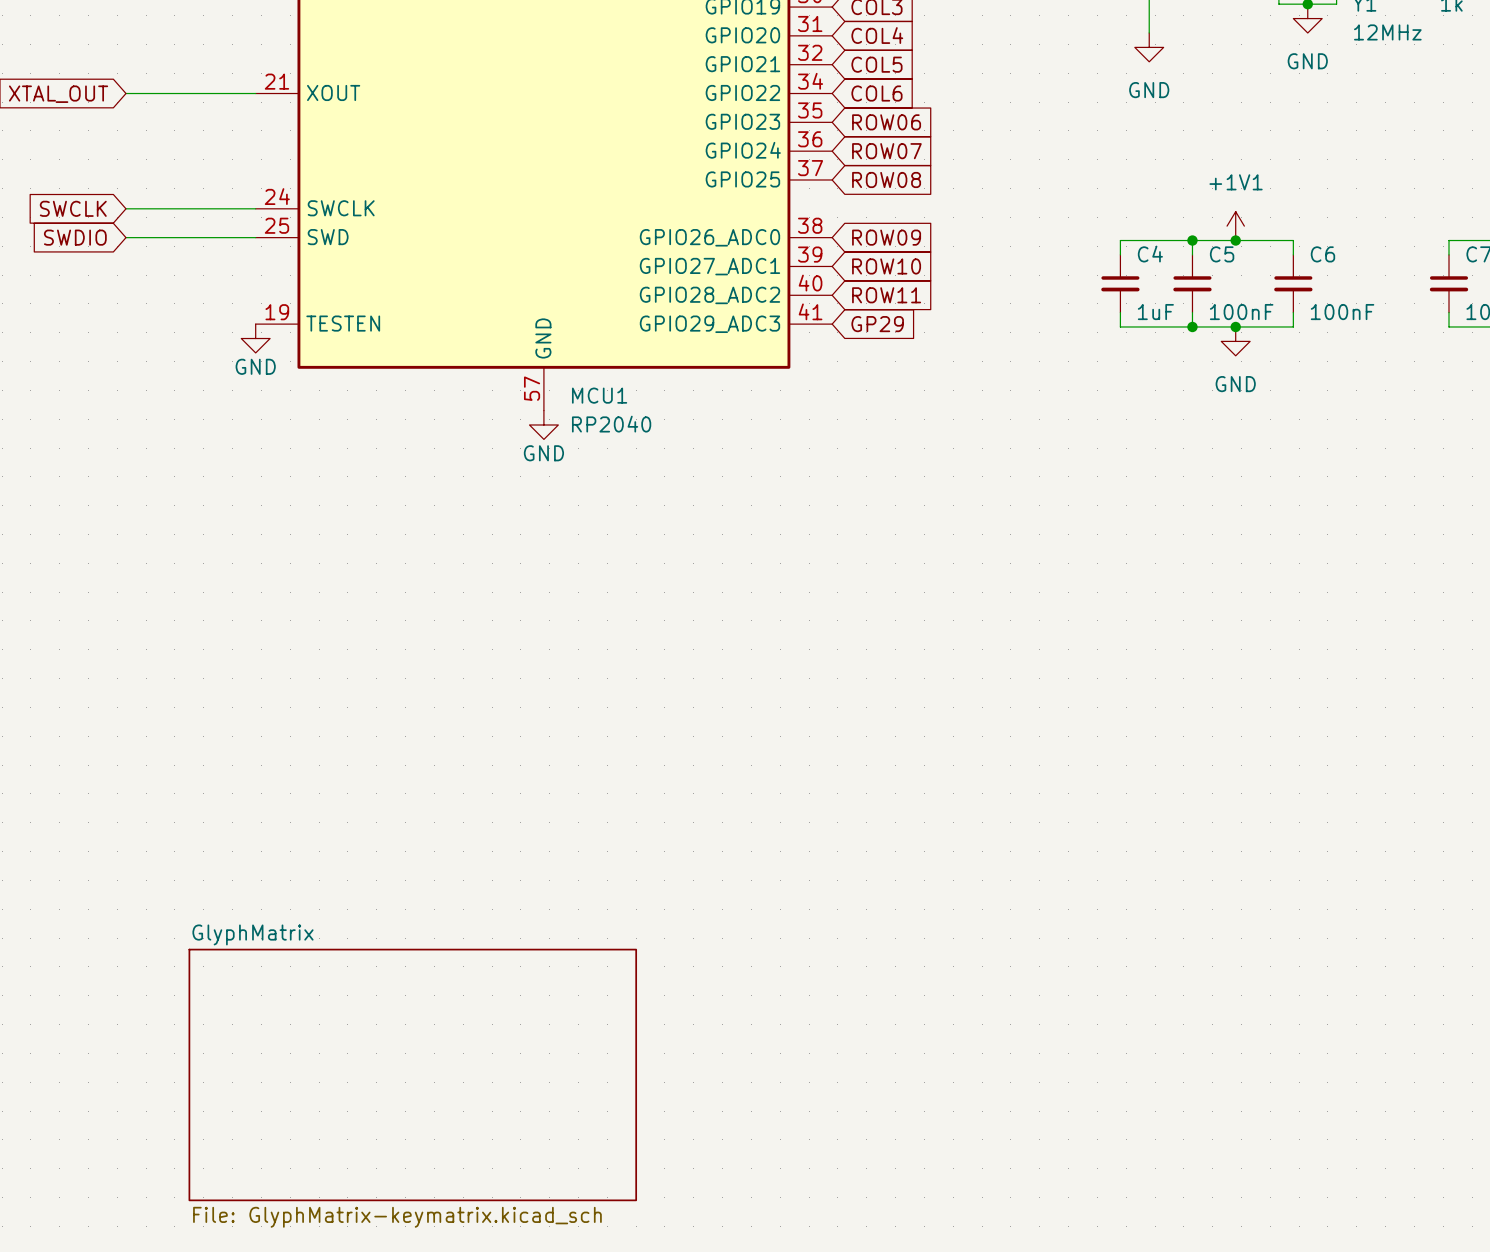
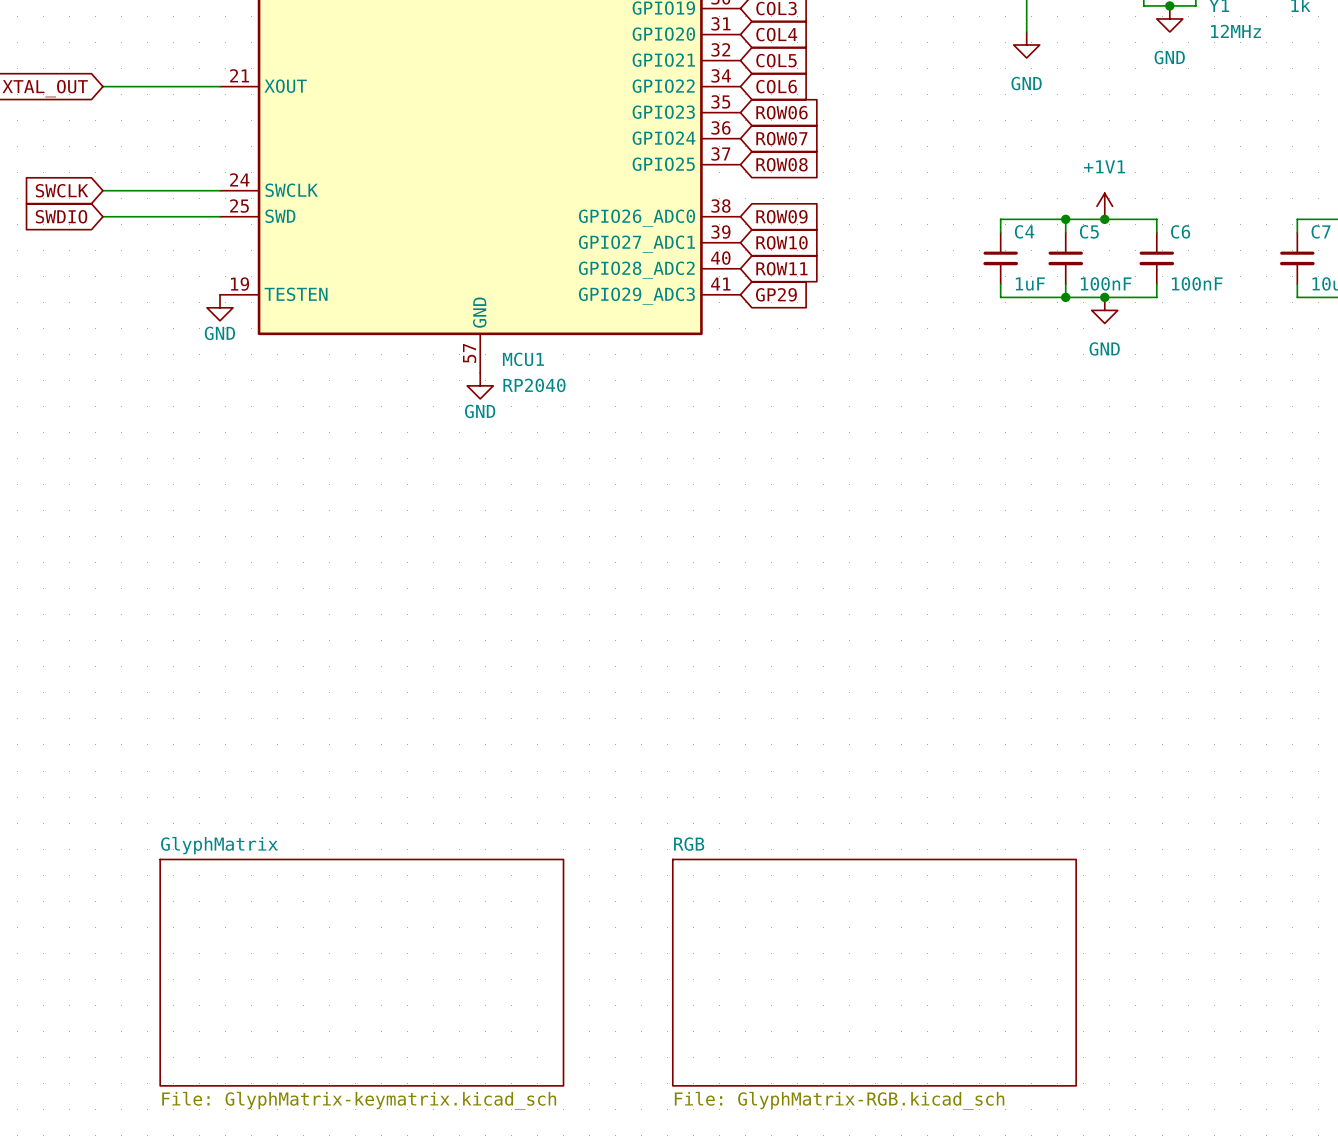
sheet RGB: none -> File: GlyphMatrix-RGB.kicad_sch (874, 972)

